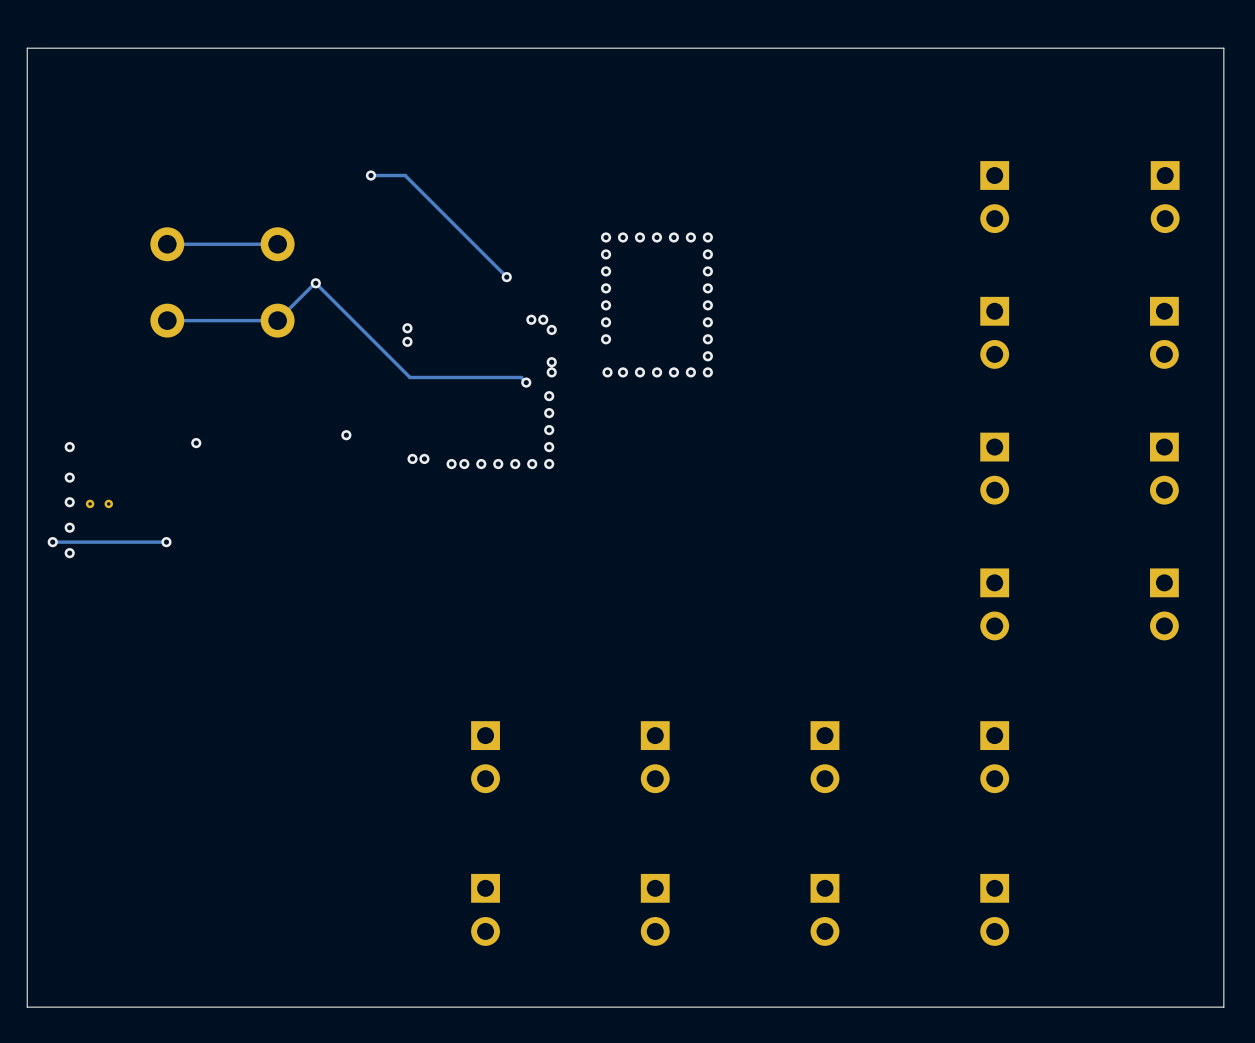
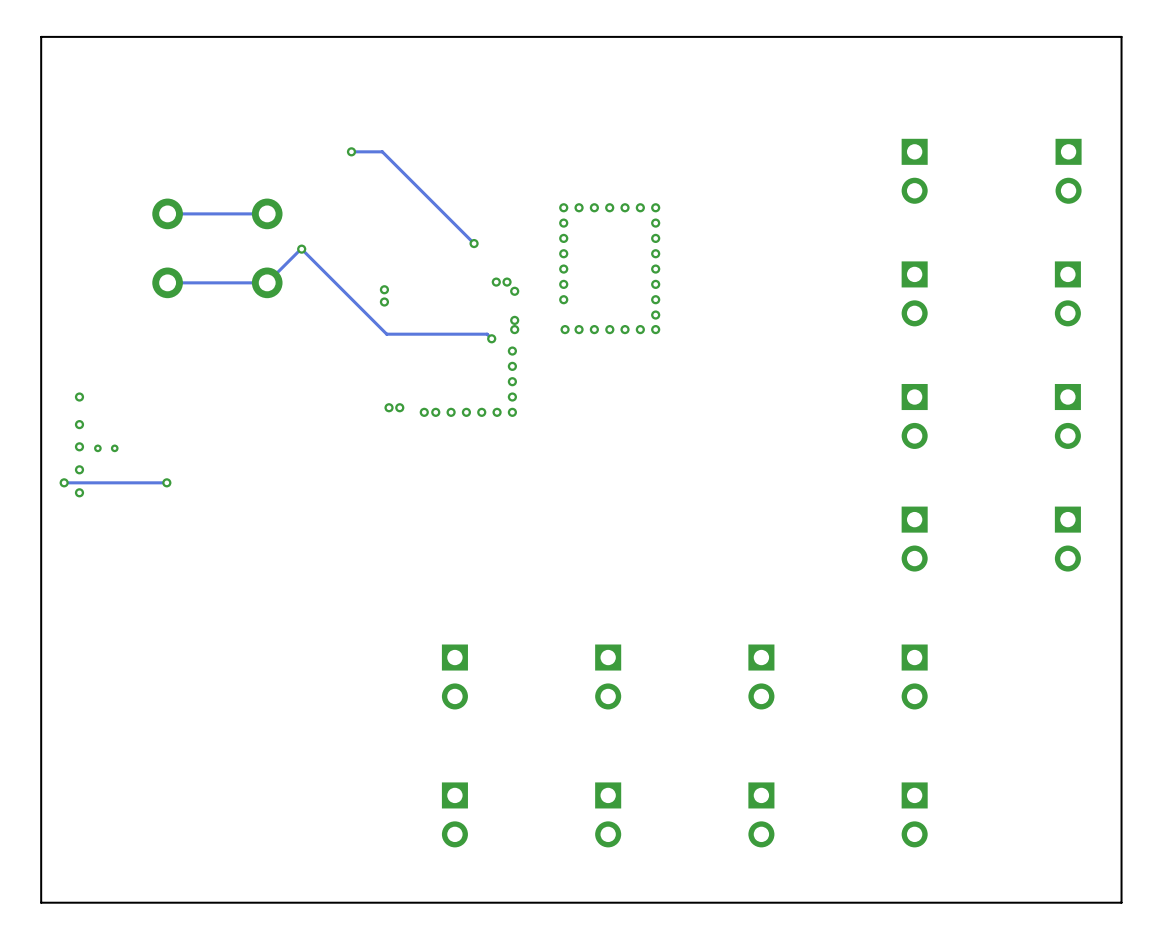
via: (346, 435) -> none
via: (196, 443) -> none

